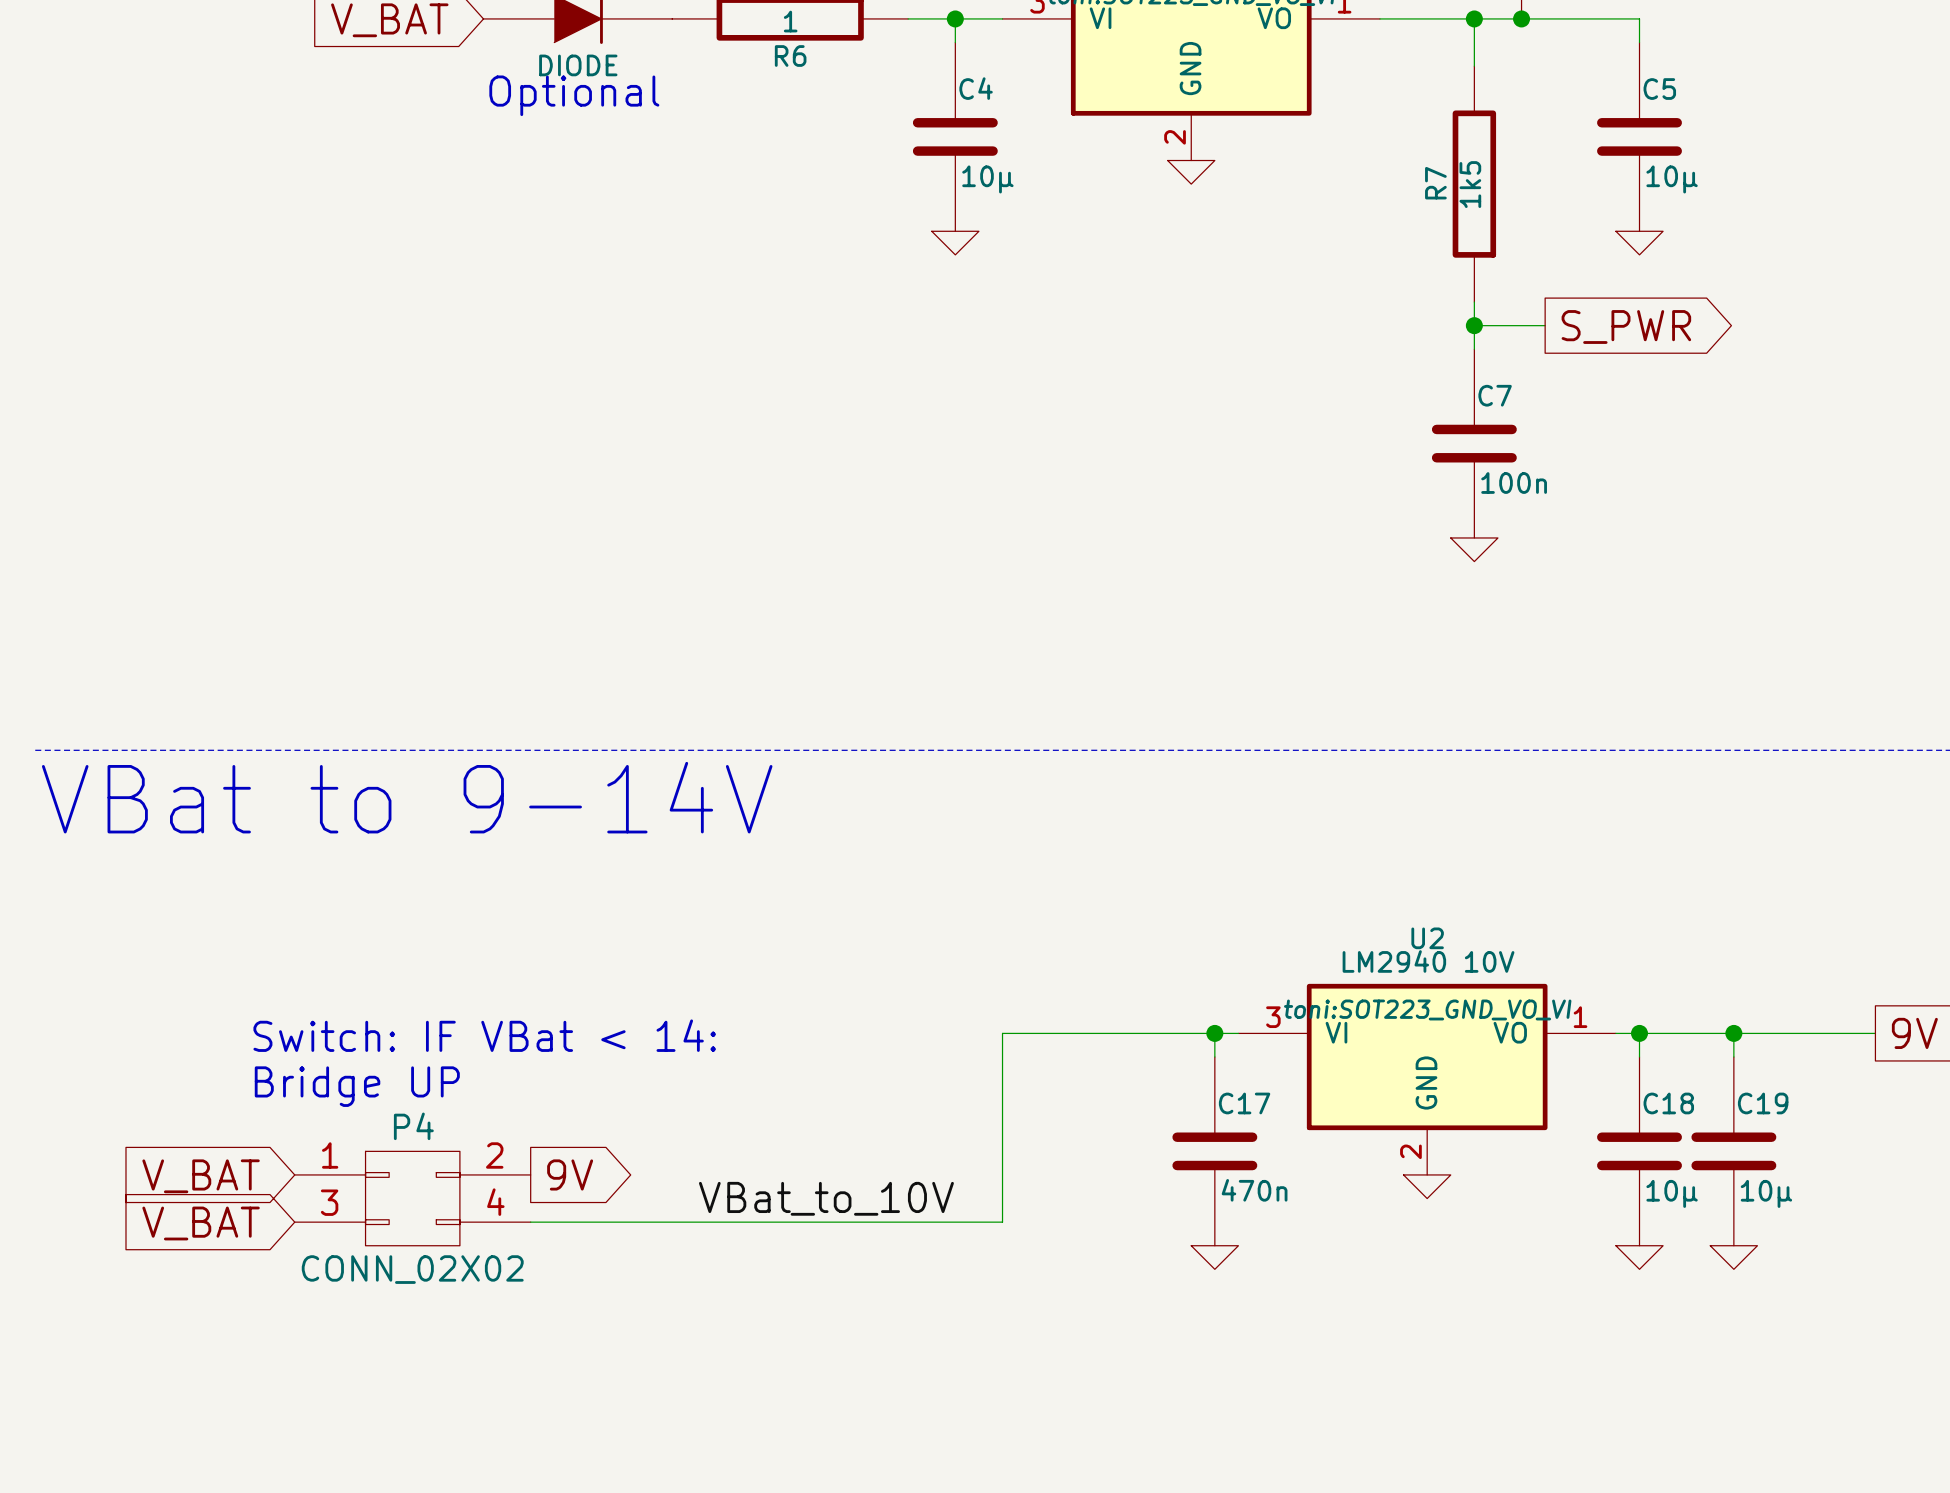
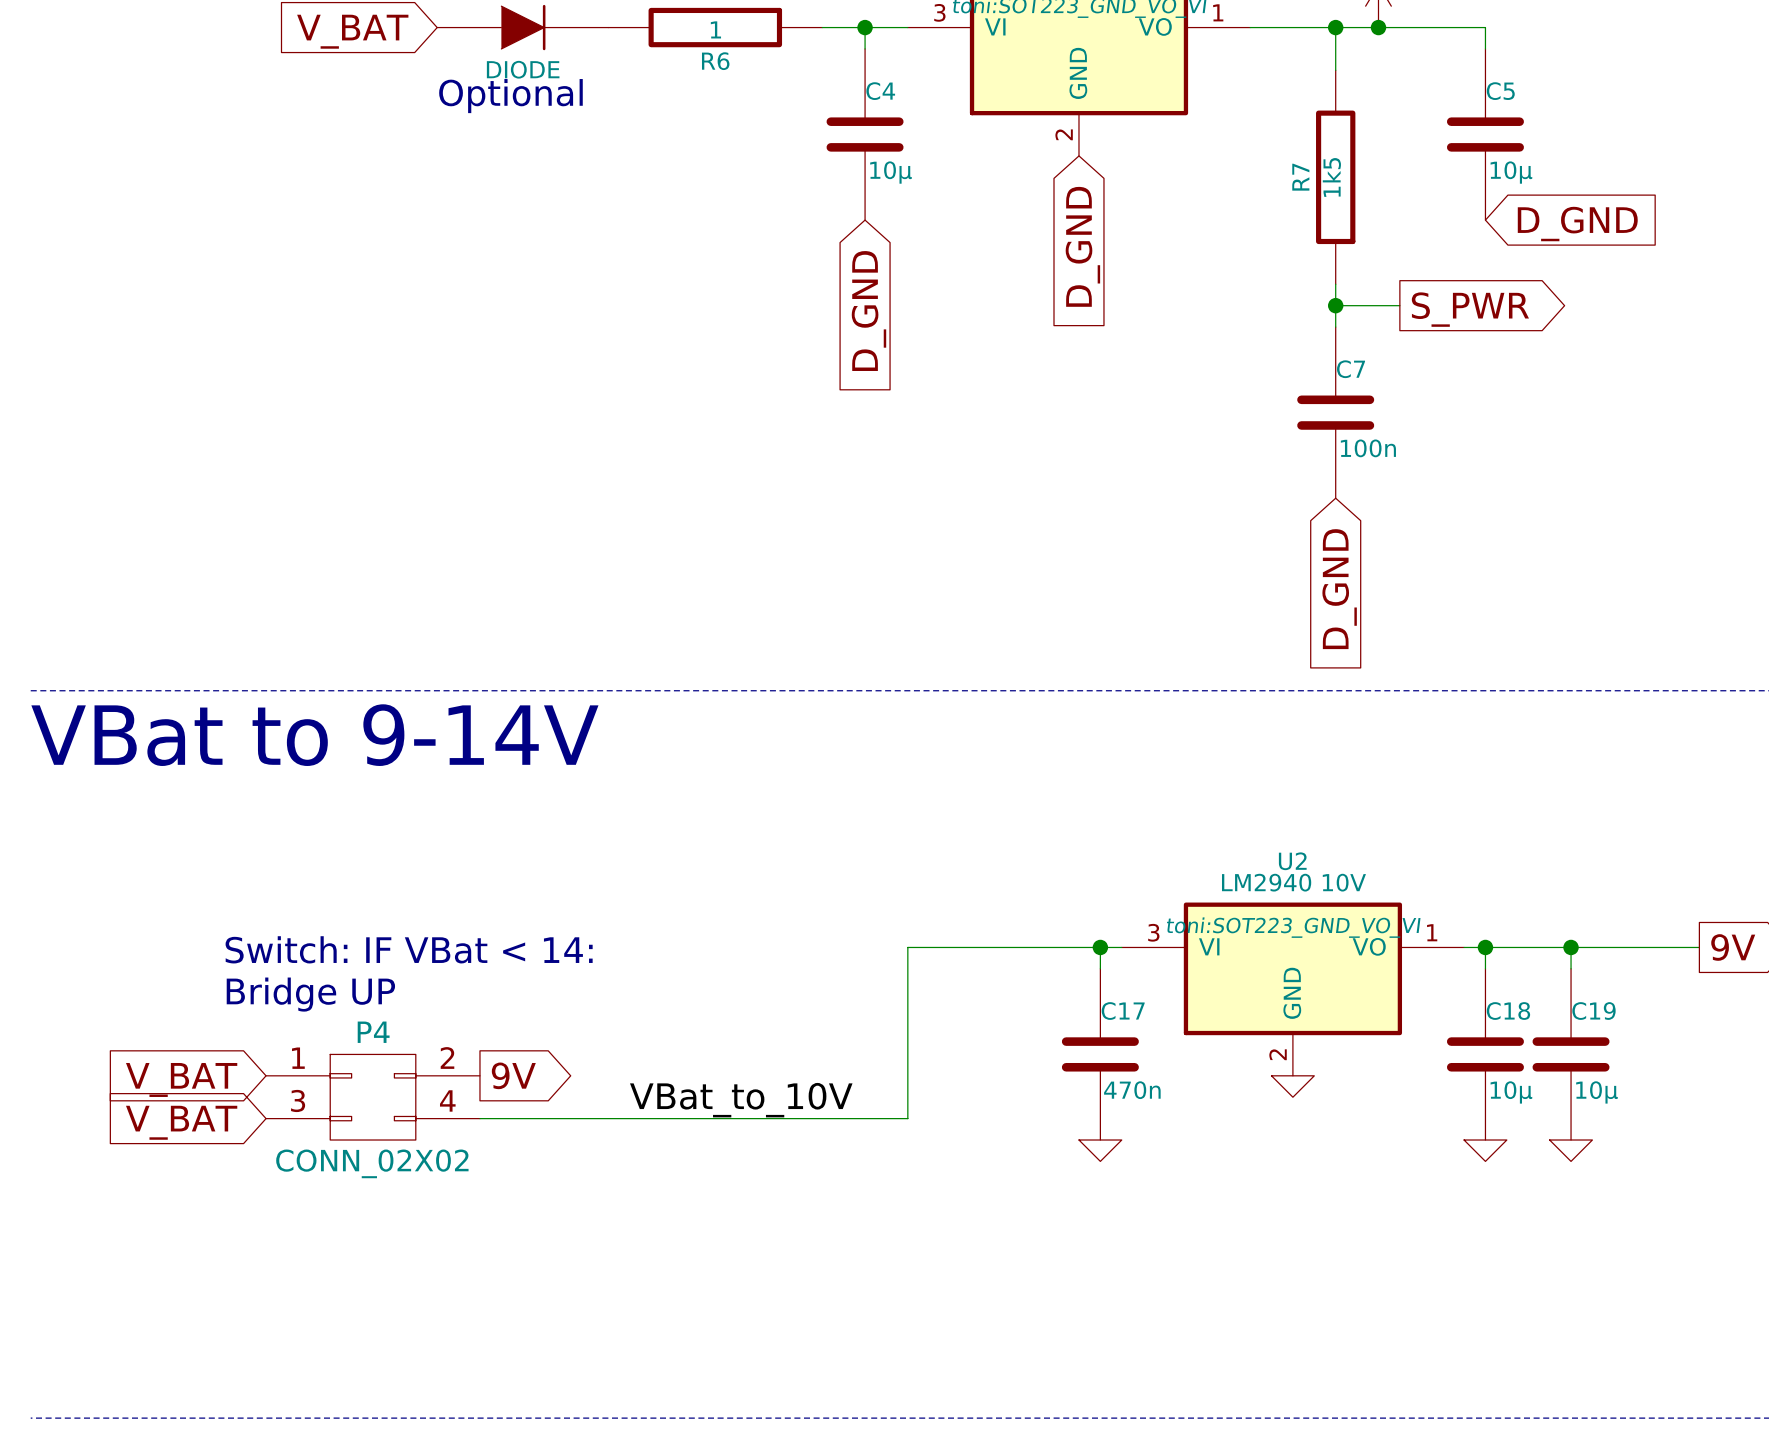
power symbol: (1191, 172) -> none
global label: none -> D_GND (1577, 224)
power symbol: (955, 243) -> none
power symbol: (1639, 243) -> none
global label: none -> D_GND (1082, 246)
global label: none -> D_GND (868, 311)
power symbol: (1474, 549) -> none
global label: none -> D_GND (1339, 589)

